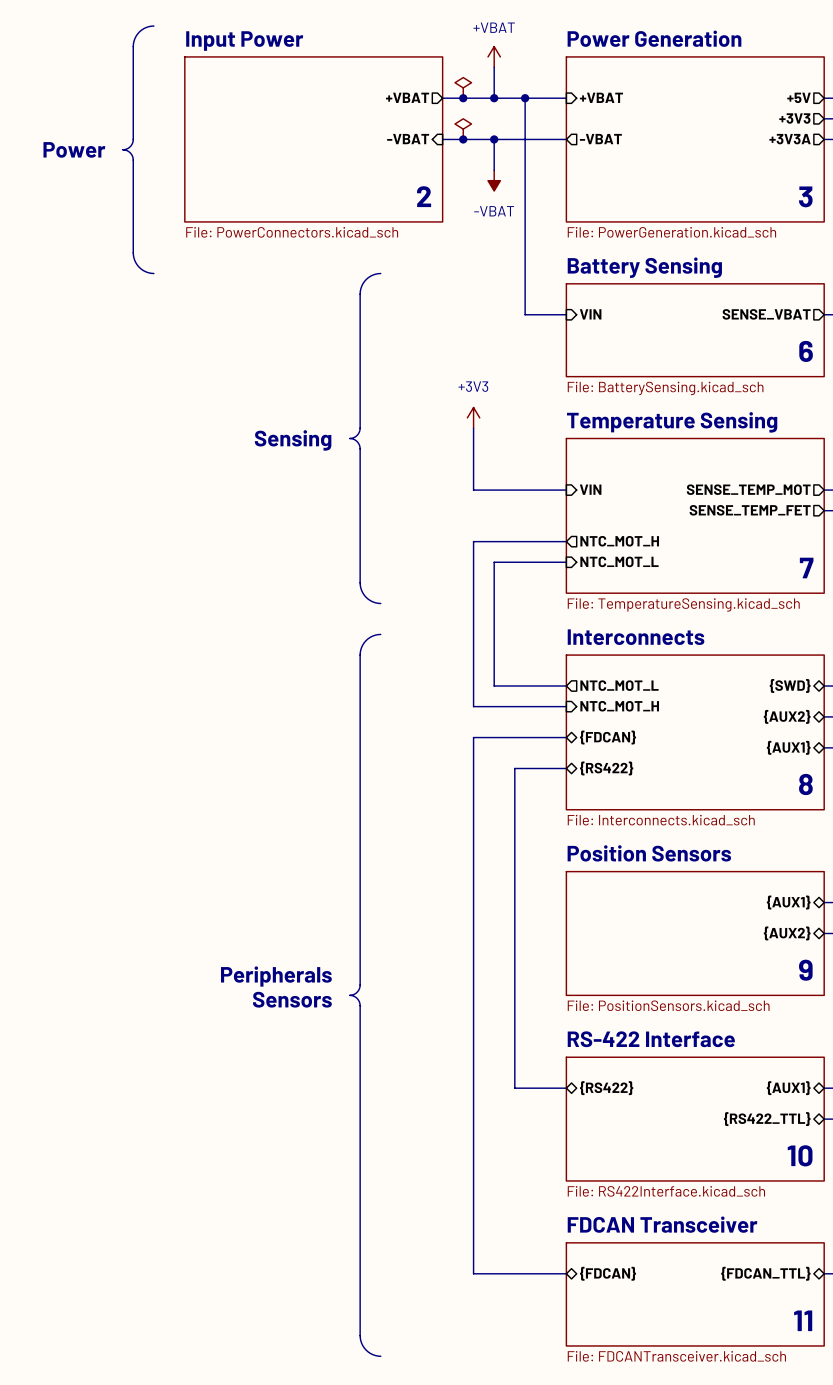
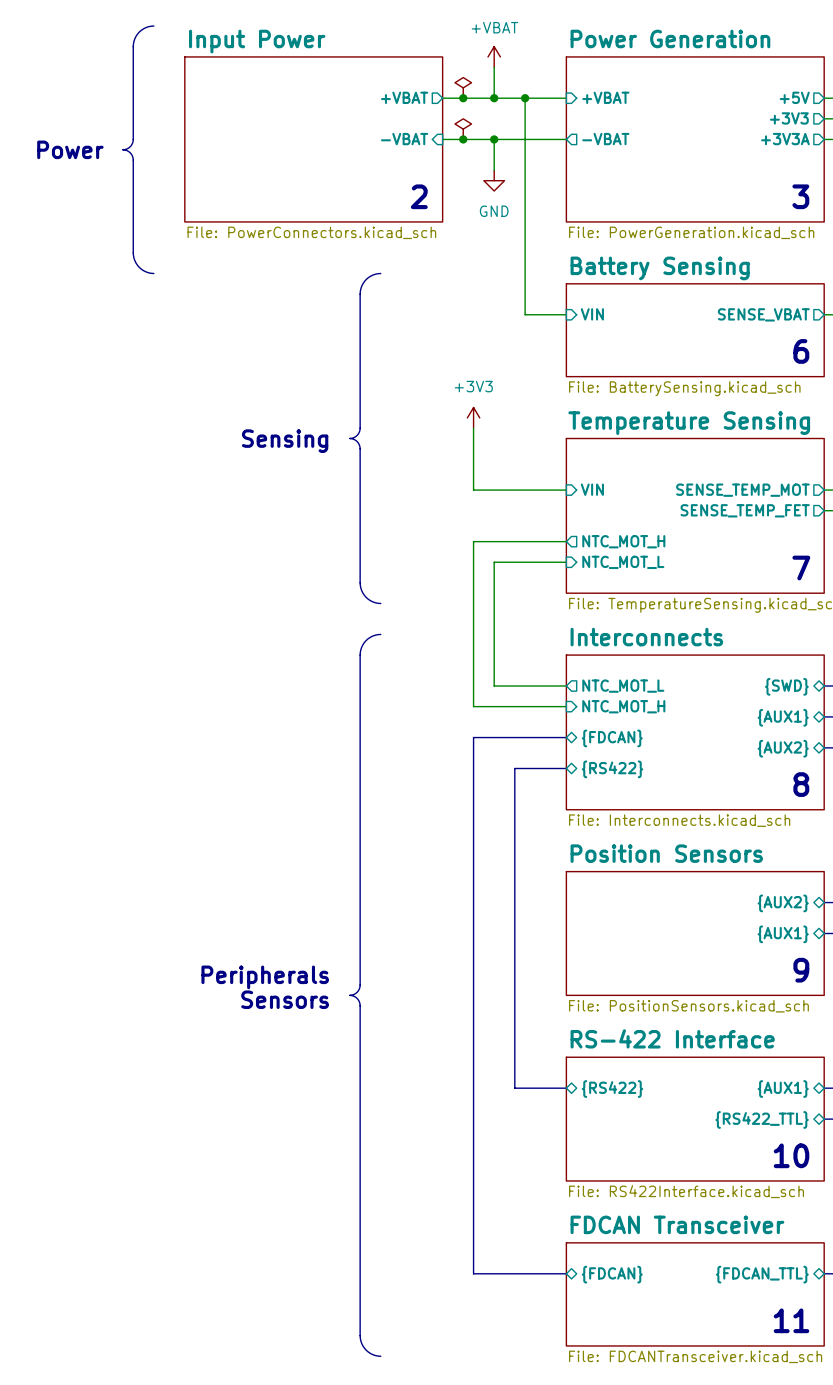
power symbol: -VBAT (494, 180) -> GND (494, 180)
sheet pin: {AUX2} (787, 716) -> {AUX1} (783, 717)
sheet pin: {AUX1} (788, 747) -> {AUX2} (783, 748)
sheet pin: {AUX1} (788, 902) -> {AUX2} (783, 903)
sheet pin: {AUX2} (787, 933) -> {AUX1} (783, 934)

